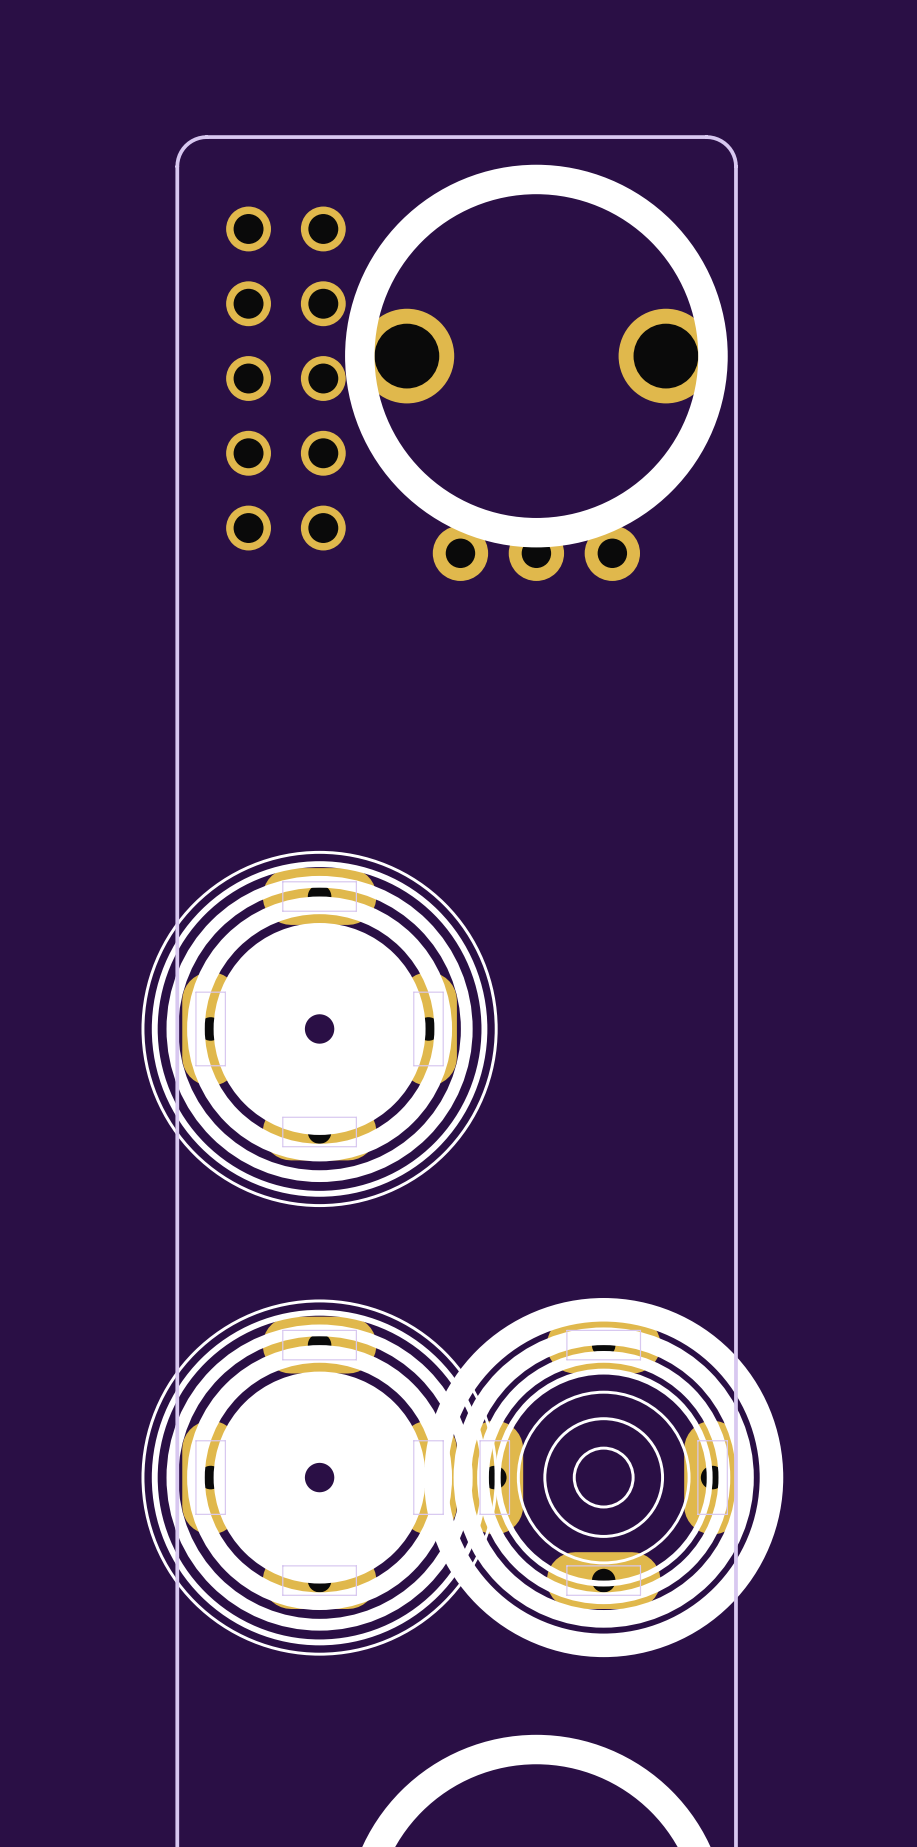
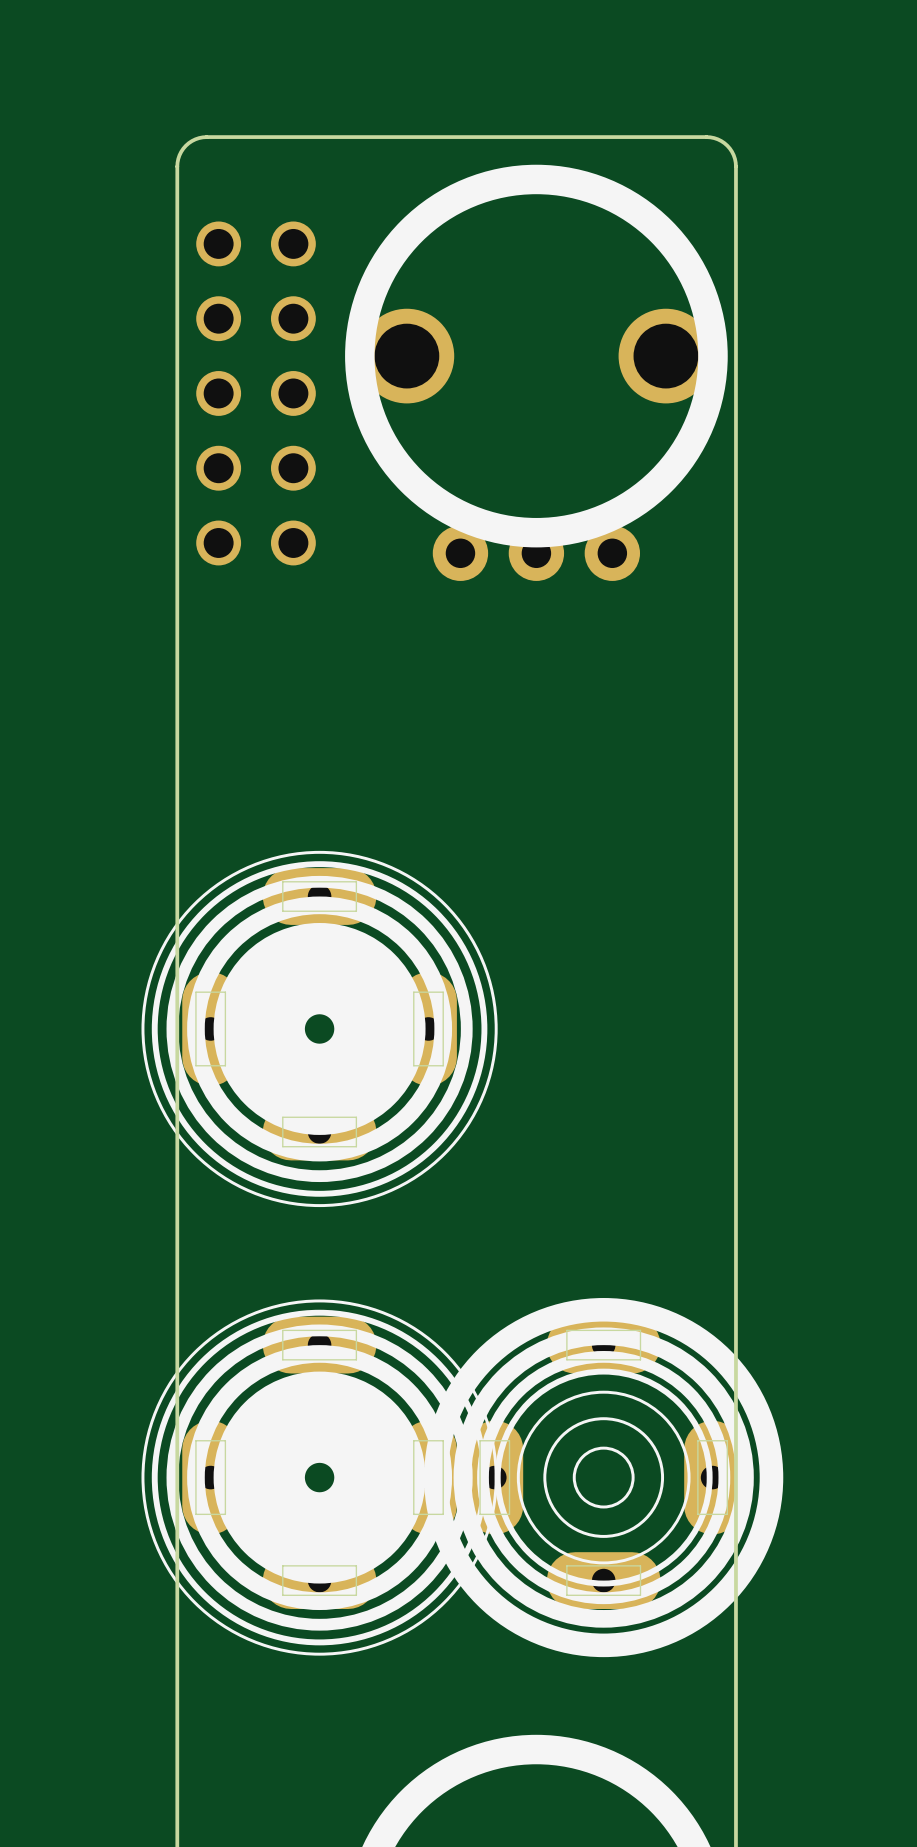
part position: (285, 378) -> (256, 393)

